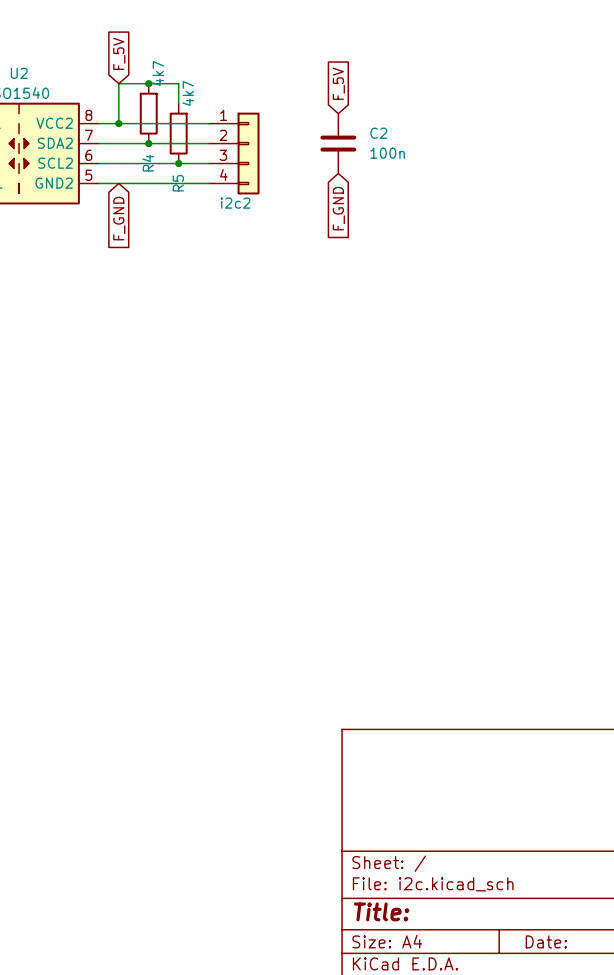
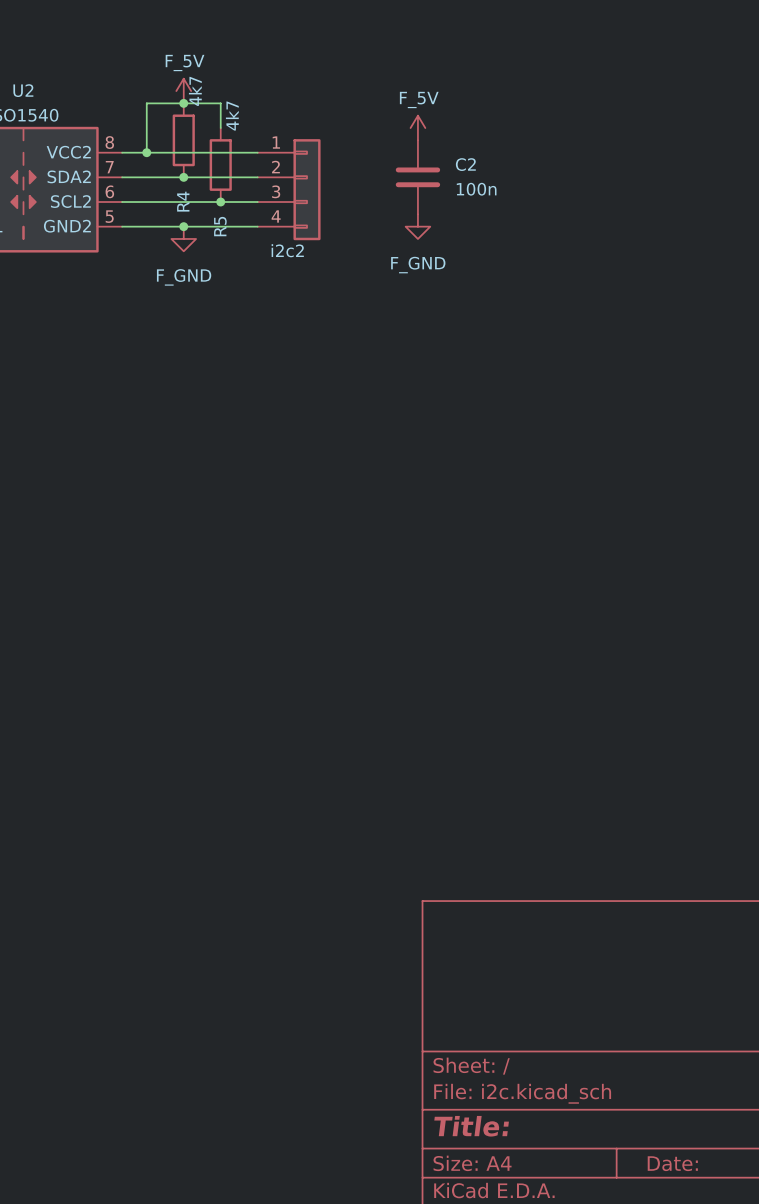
global label: F_5V (119, 53) -> none
power symbol: none -> F_5V (183, 91)
global label: F_5V (338, 83) -> none
power symbol: none -> F_5V (417, 128)
junction: none -> (183, 226)
power symbol: none -> F_GND (417, 226)
power symbol: none -> F_GND (183, 238)
global label: F_GND (338, 208) -> none
global label: F_GND (119, 218) -> none

